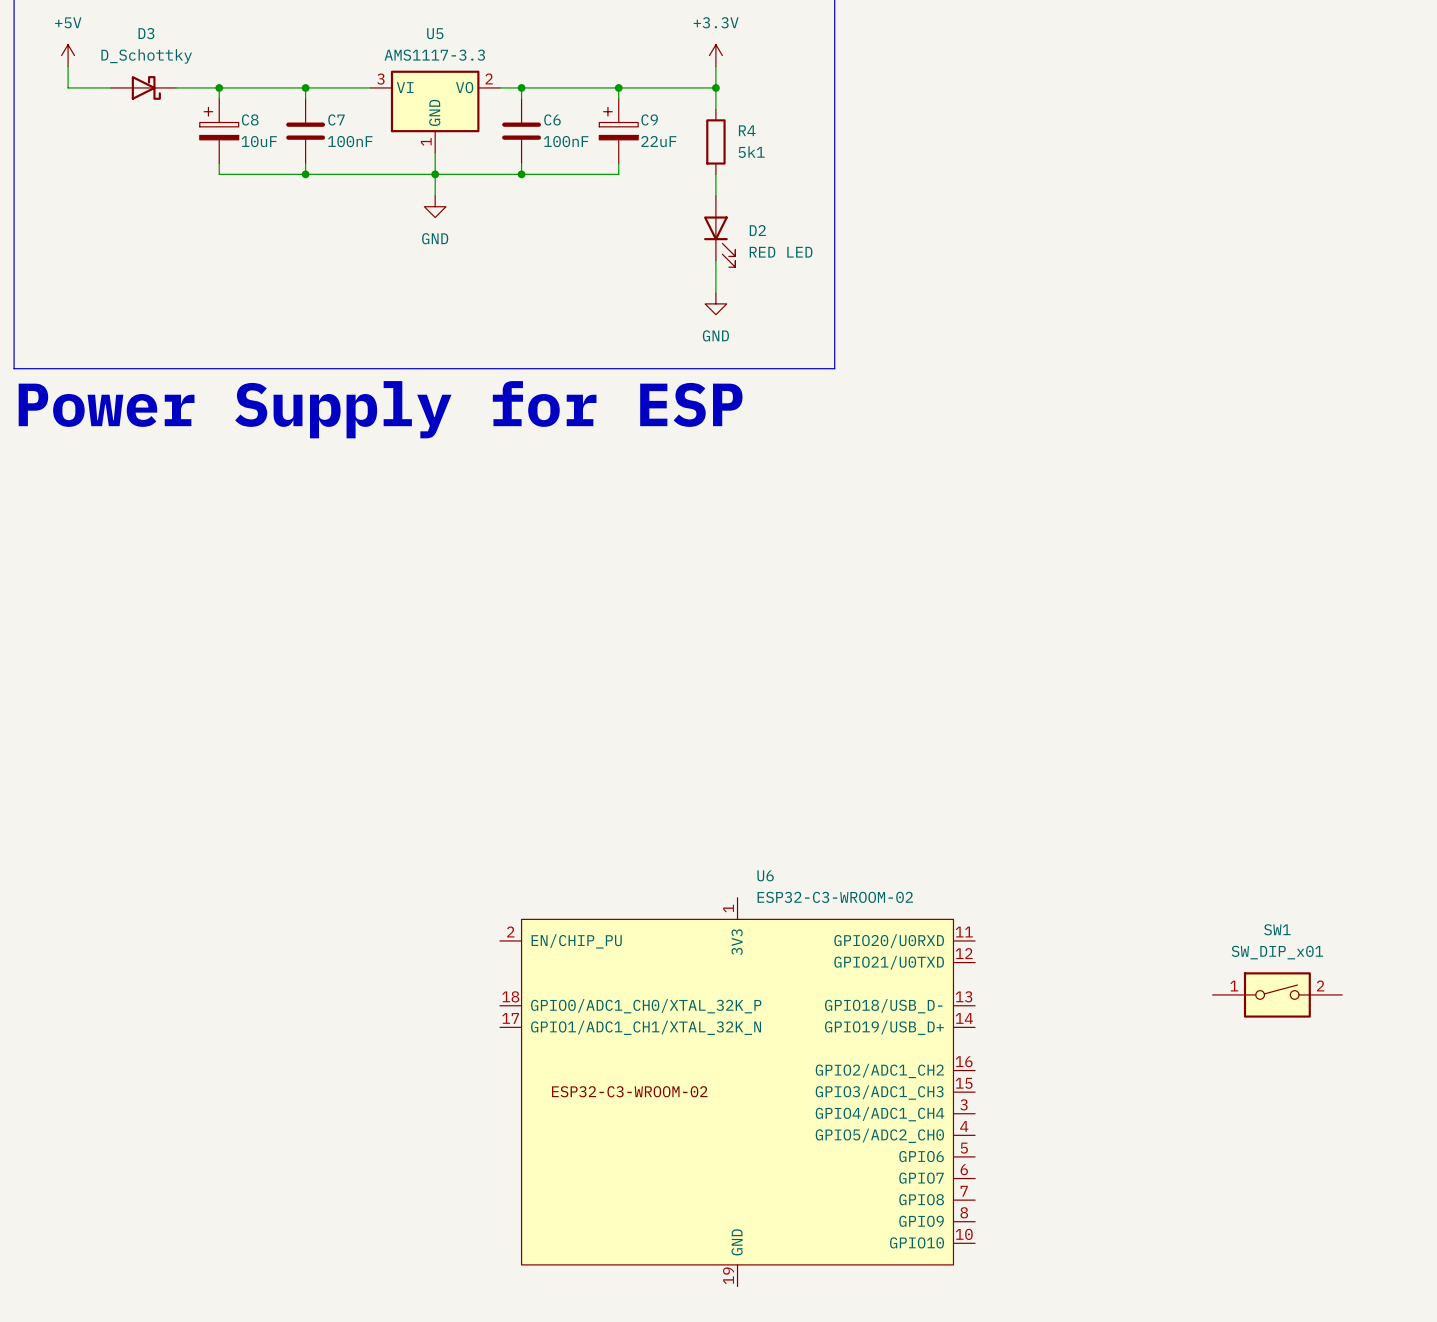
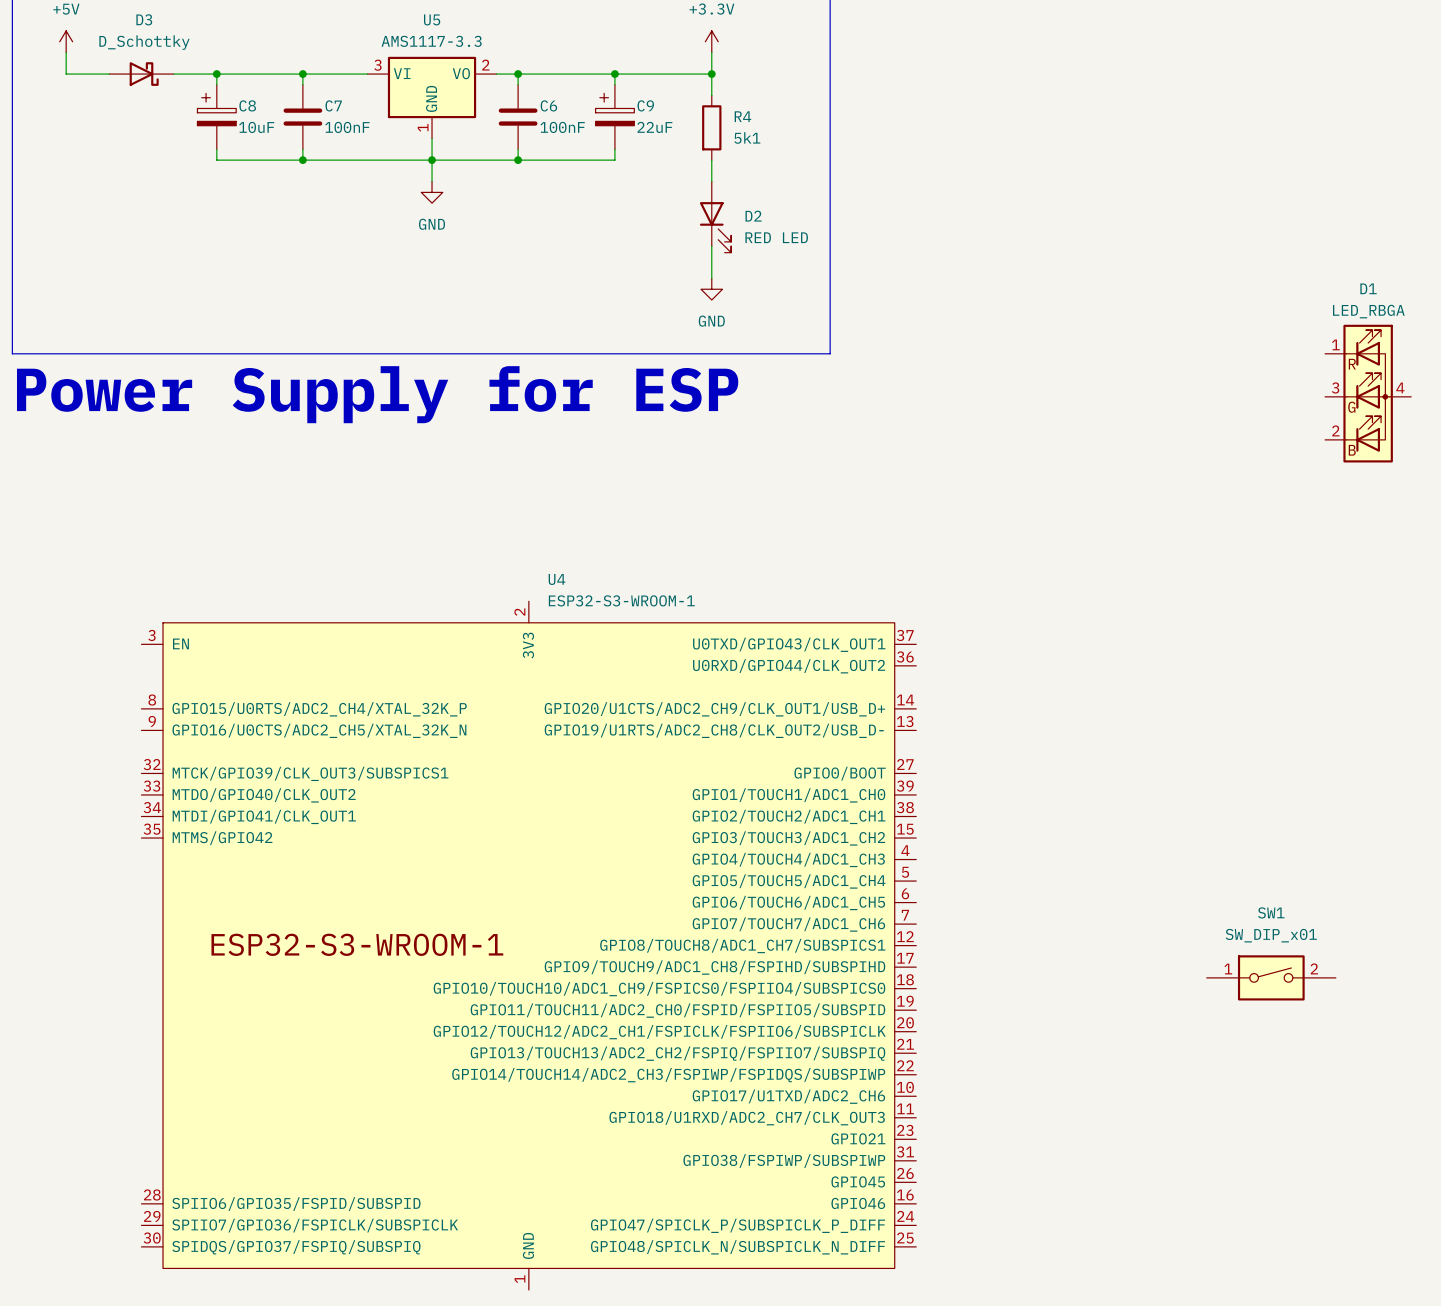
D1: none -> LED_RBGA (1368, 393)
U4: none -> ESP32-S3-WROOM-1 (528, 945)
U6: ESP32-C3-WROOM-02 (737, 1092) -> none

